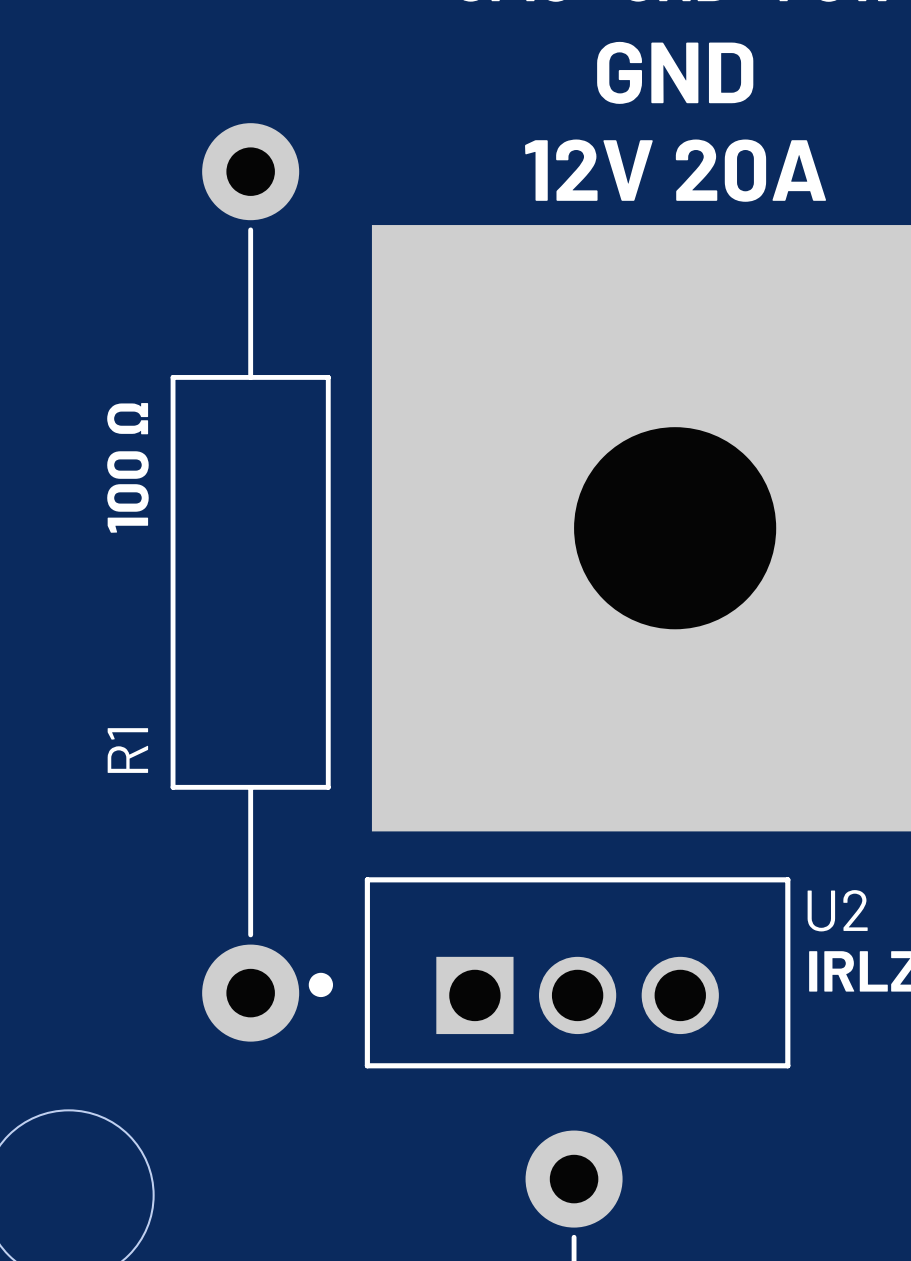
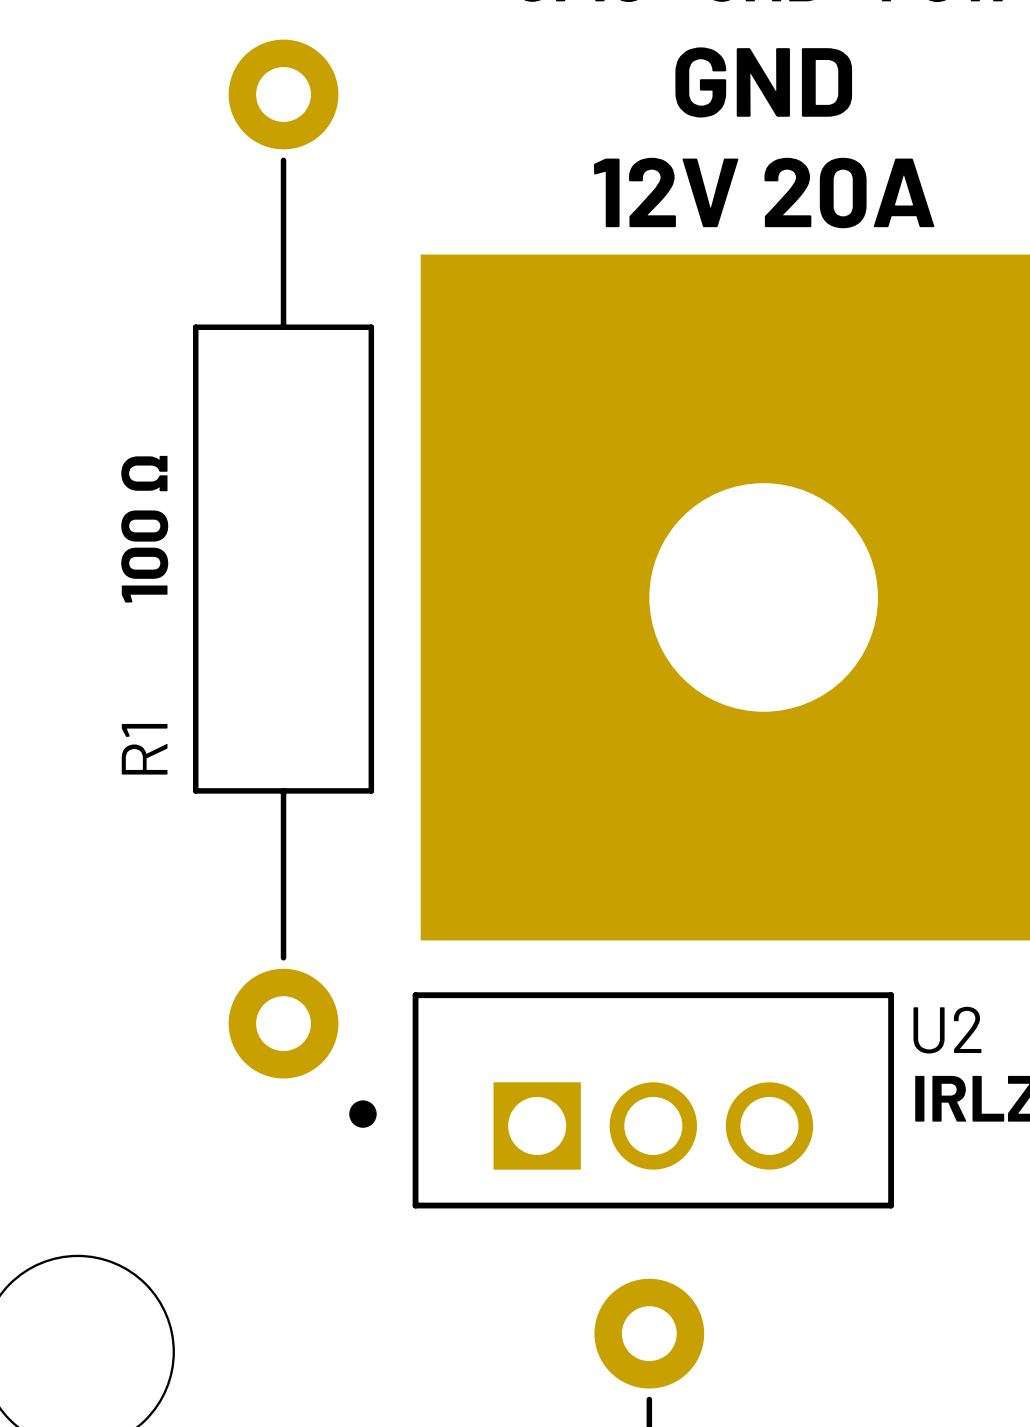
R1 position: (250, 582) -> (283, 559)

